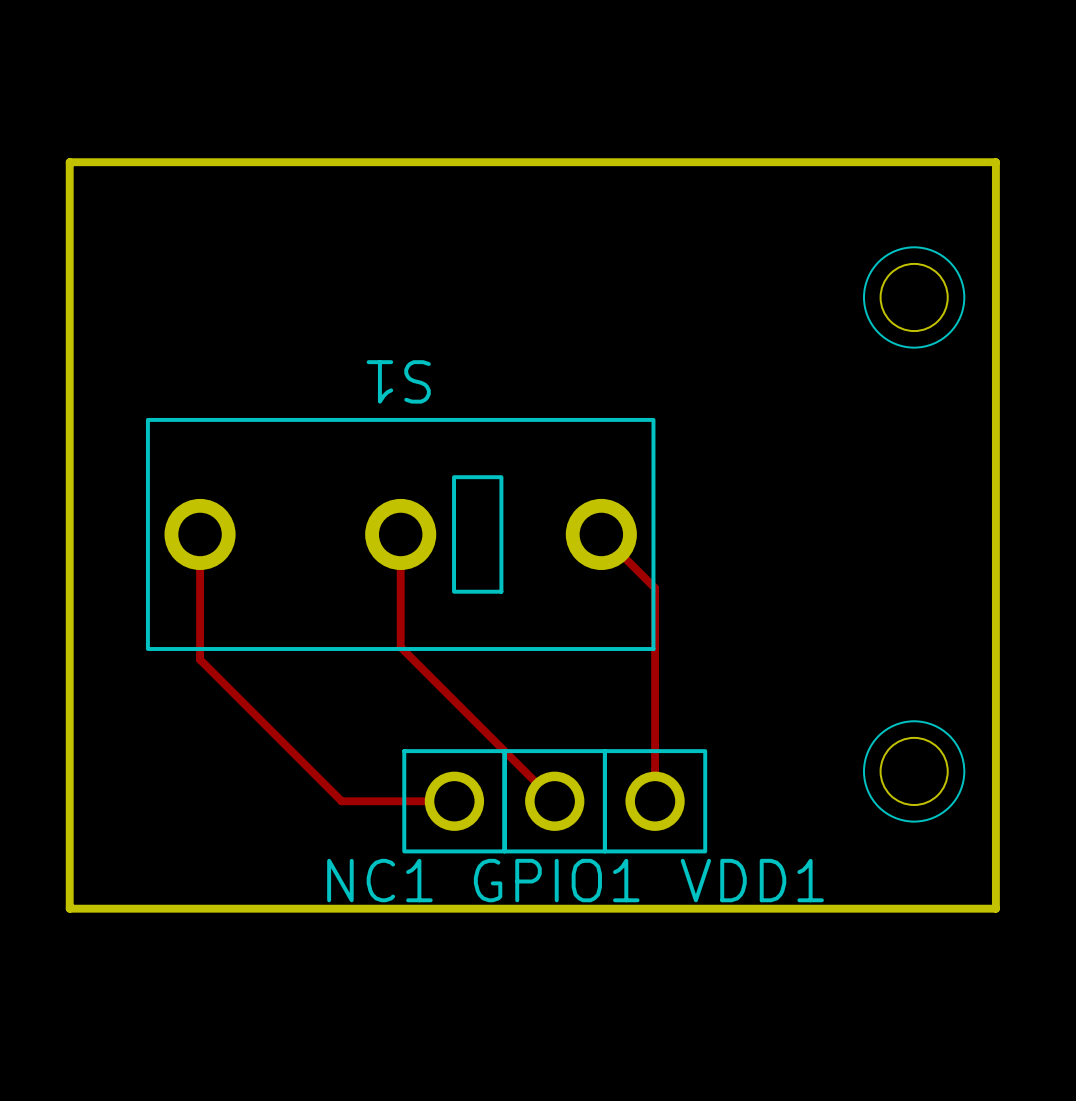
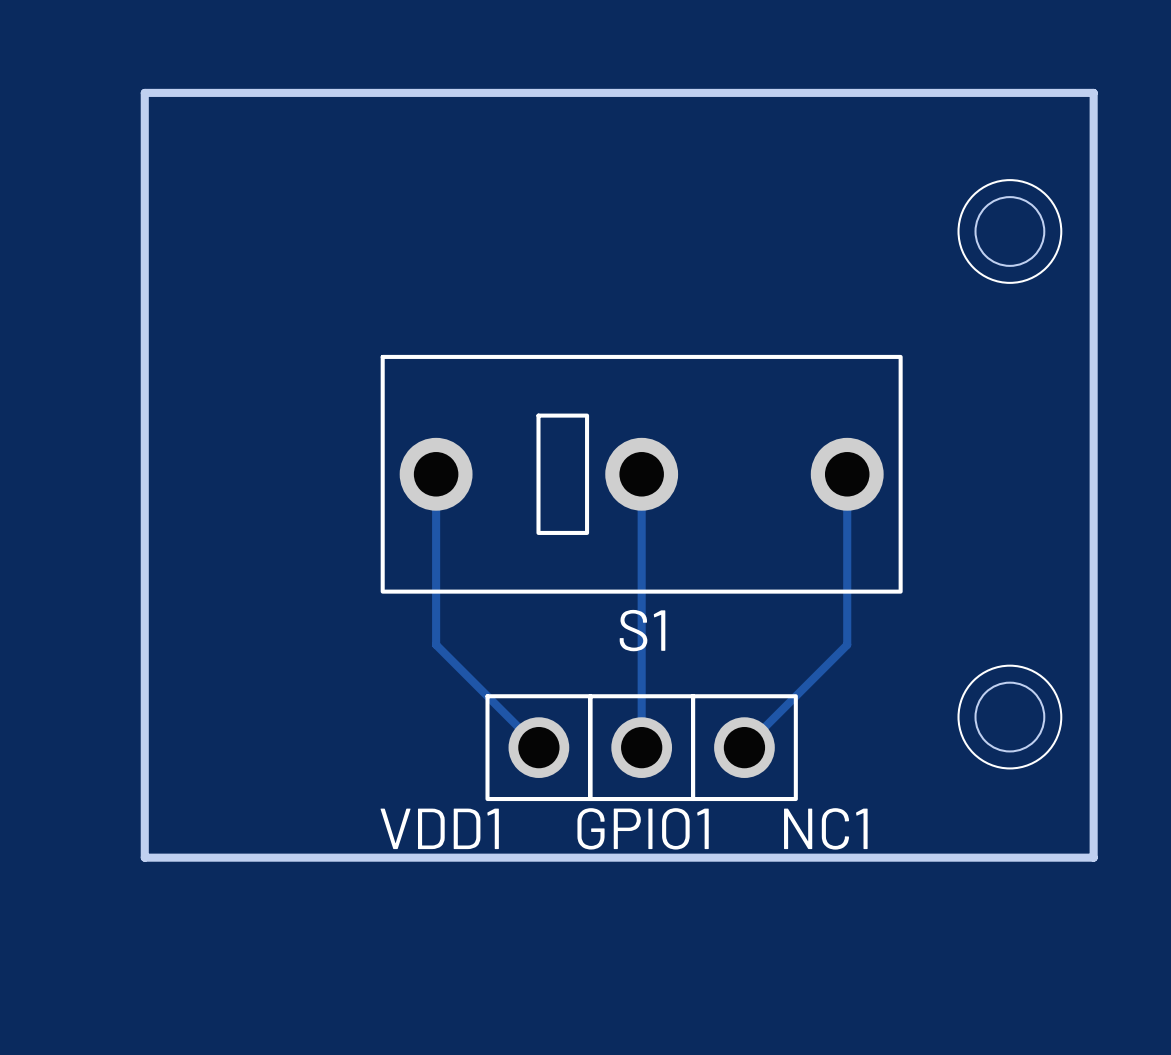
track: (200, 534) (200, 659) (341, 801) (454, 801) -> (436, 474) (436, 644) (538, 747)
track: (400, 534) (400, 647) (554, 801) -> (641, 474) (641, 747)
S1 rotation: 0° (400, 534) -> 180° (641, 474)
track: (601, 534) (655, 588) (655, 801) -> (847, 474) (847, 644) (744, 747)
NC1 name: NC1 (379, 880) -> VDD1 (439, 828)
VDD1 name: VDD1 (752, 880) -> NC1 (825, 828)

